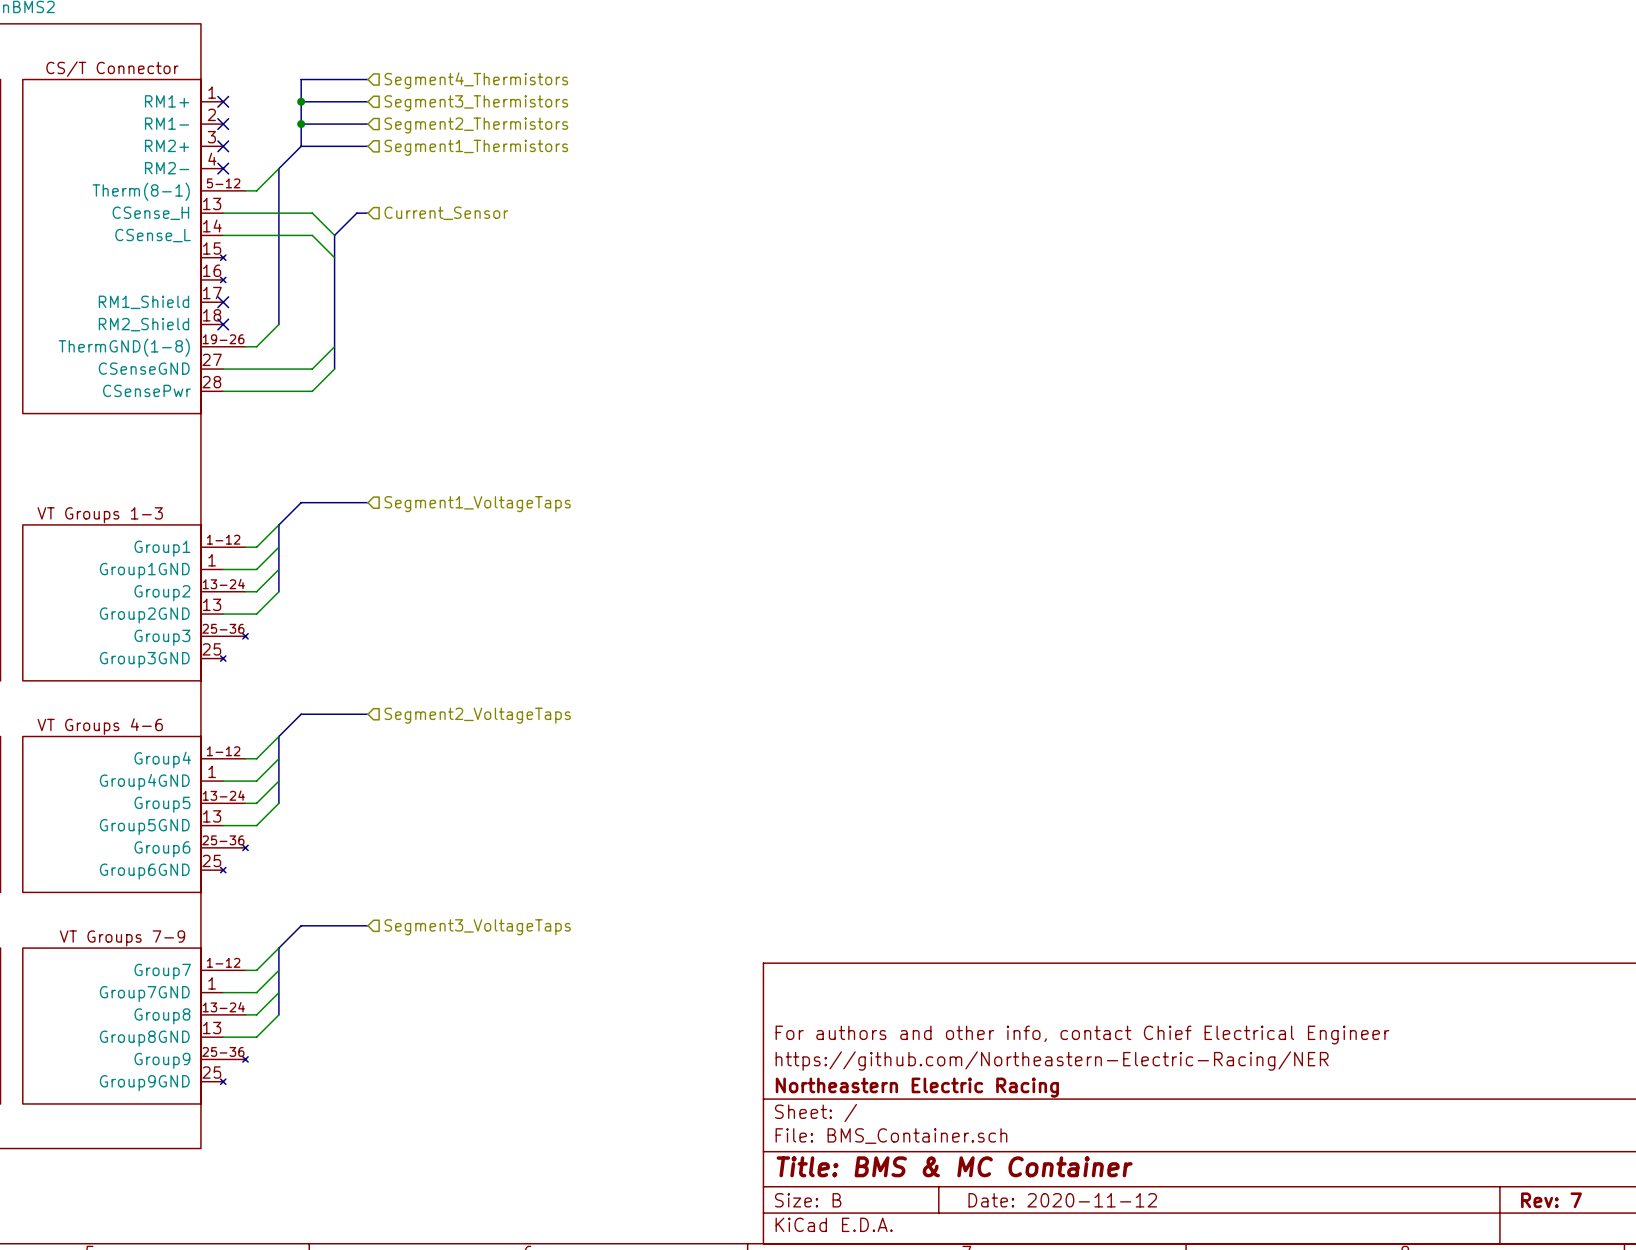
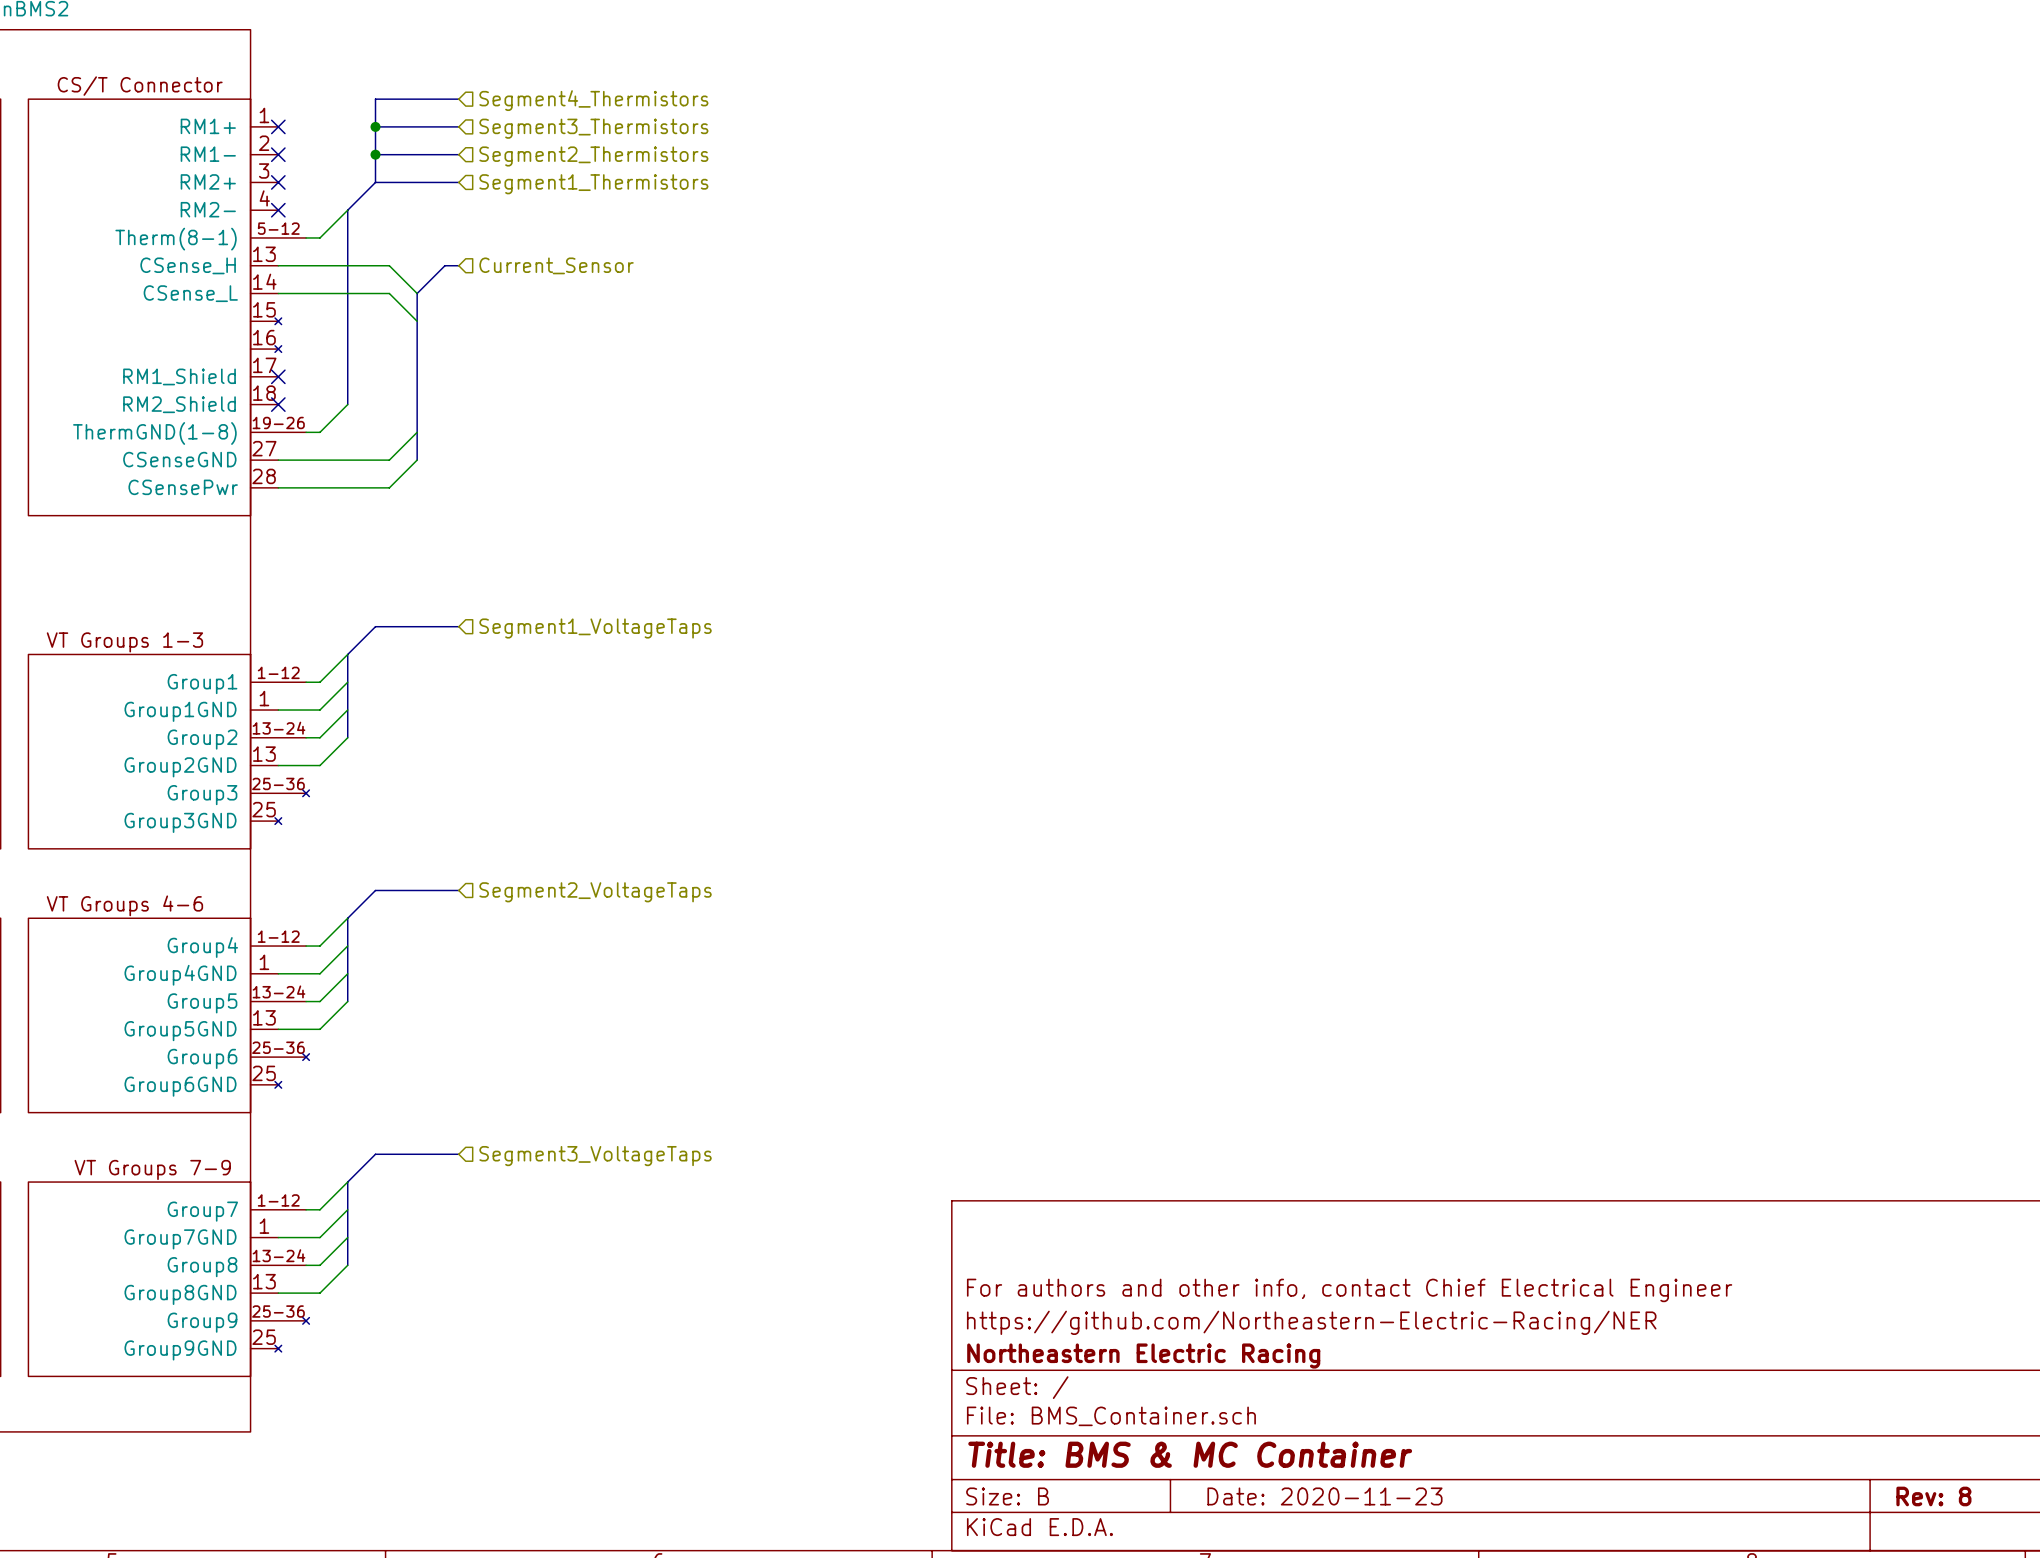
title block: Date: 2020-11-12 (1062, 1200) -> Date: 2020-11-23 (1324, 1496)
title block: Rev: 7 (1551, 1200) -> Rev: 8 (1933, 1496)

